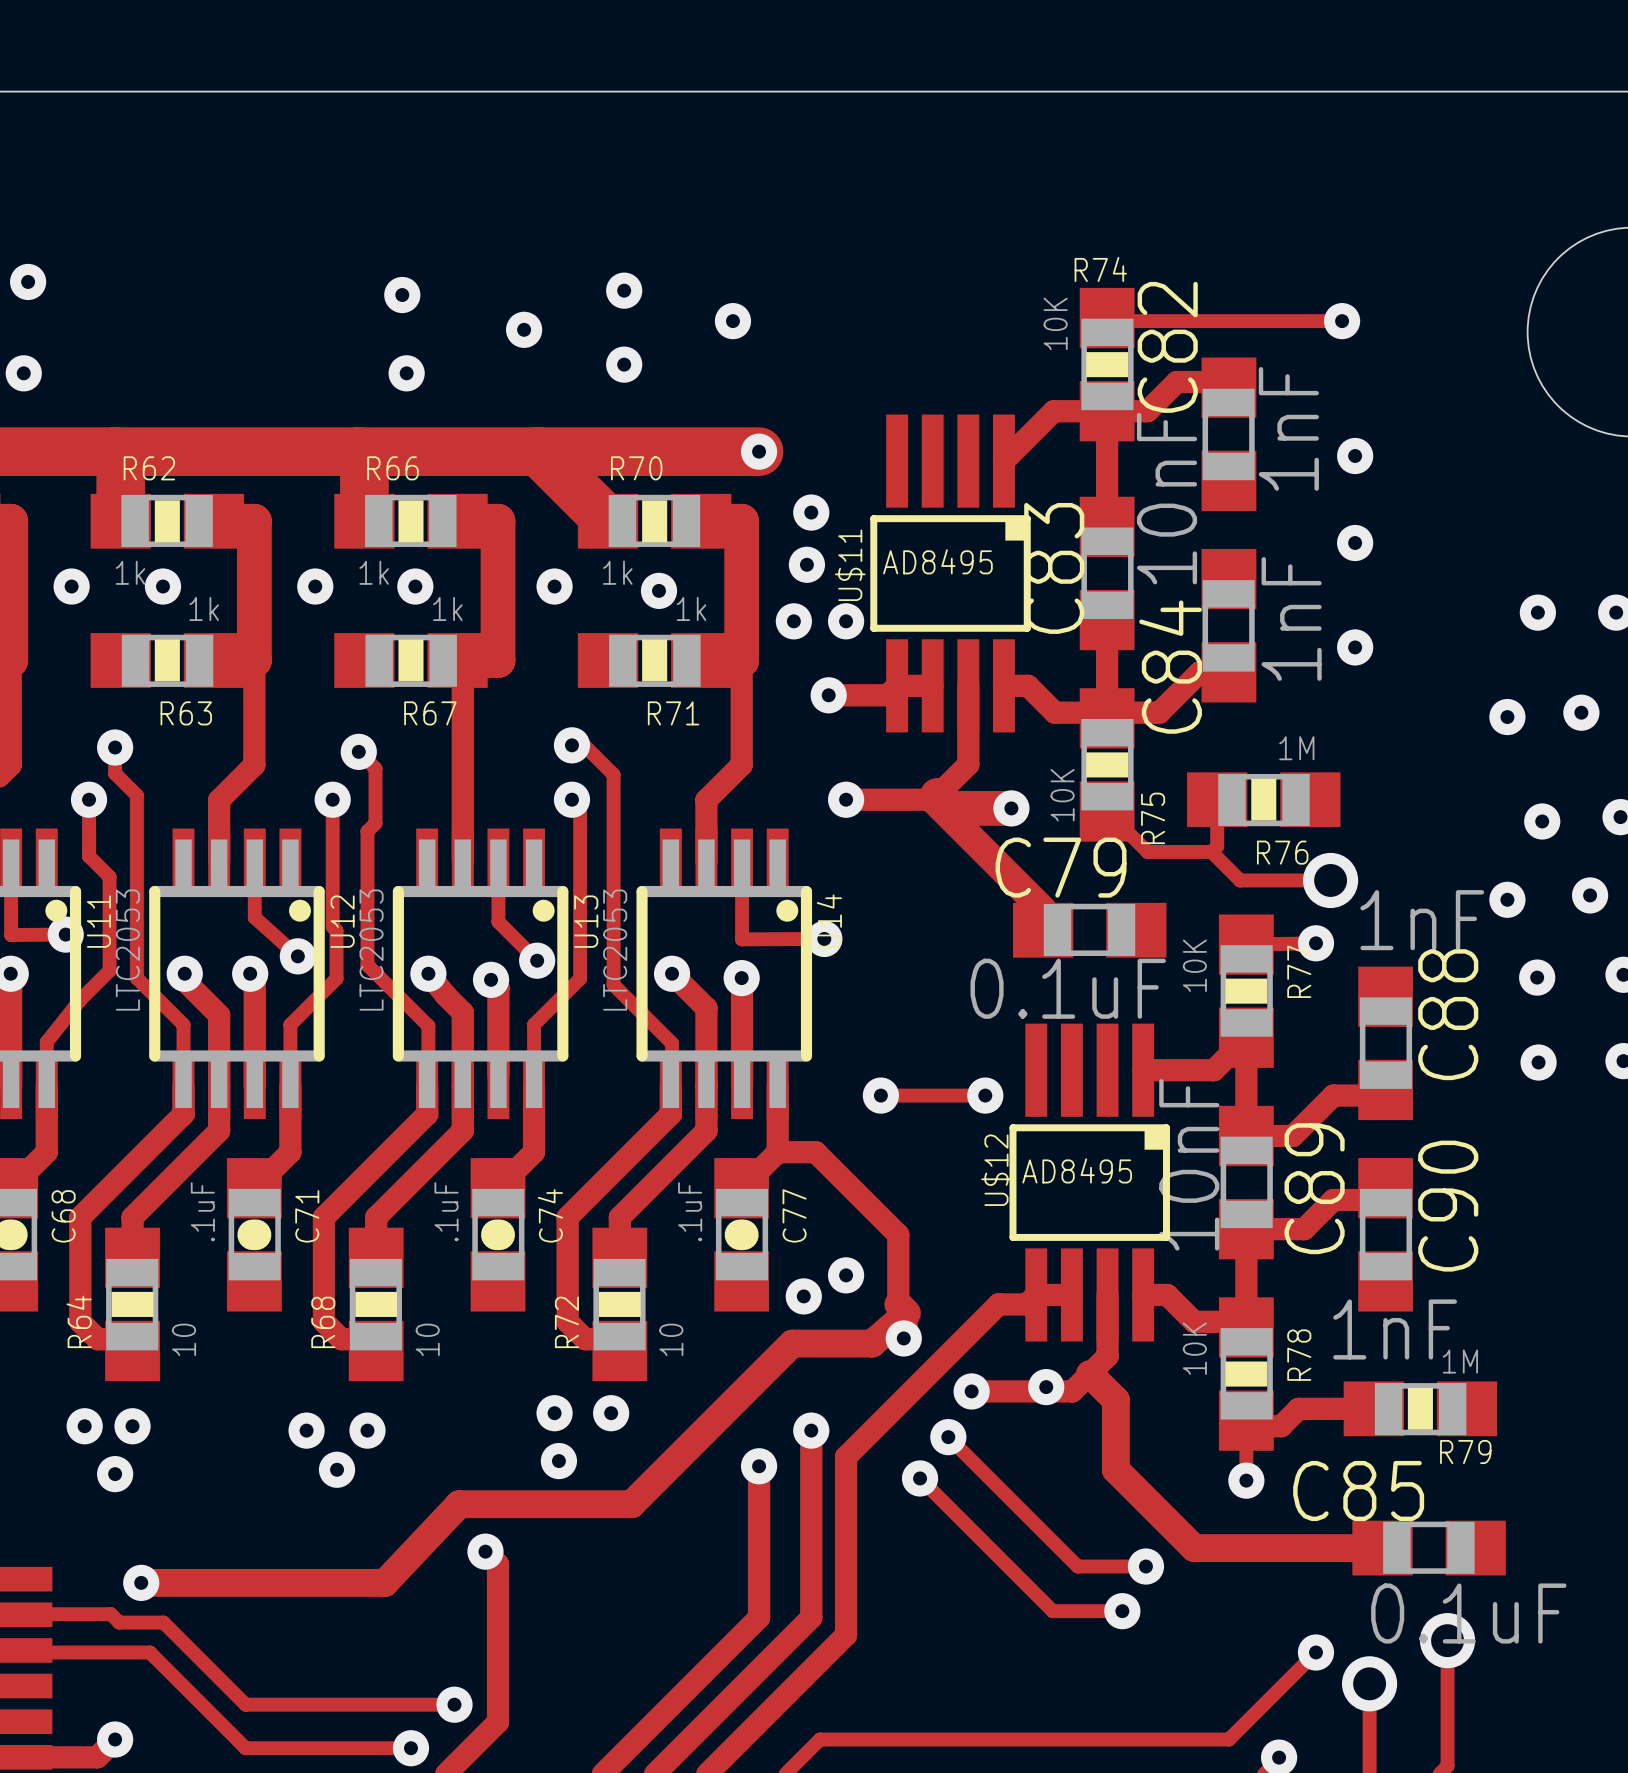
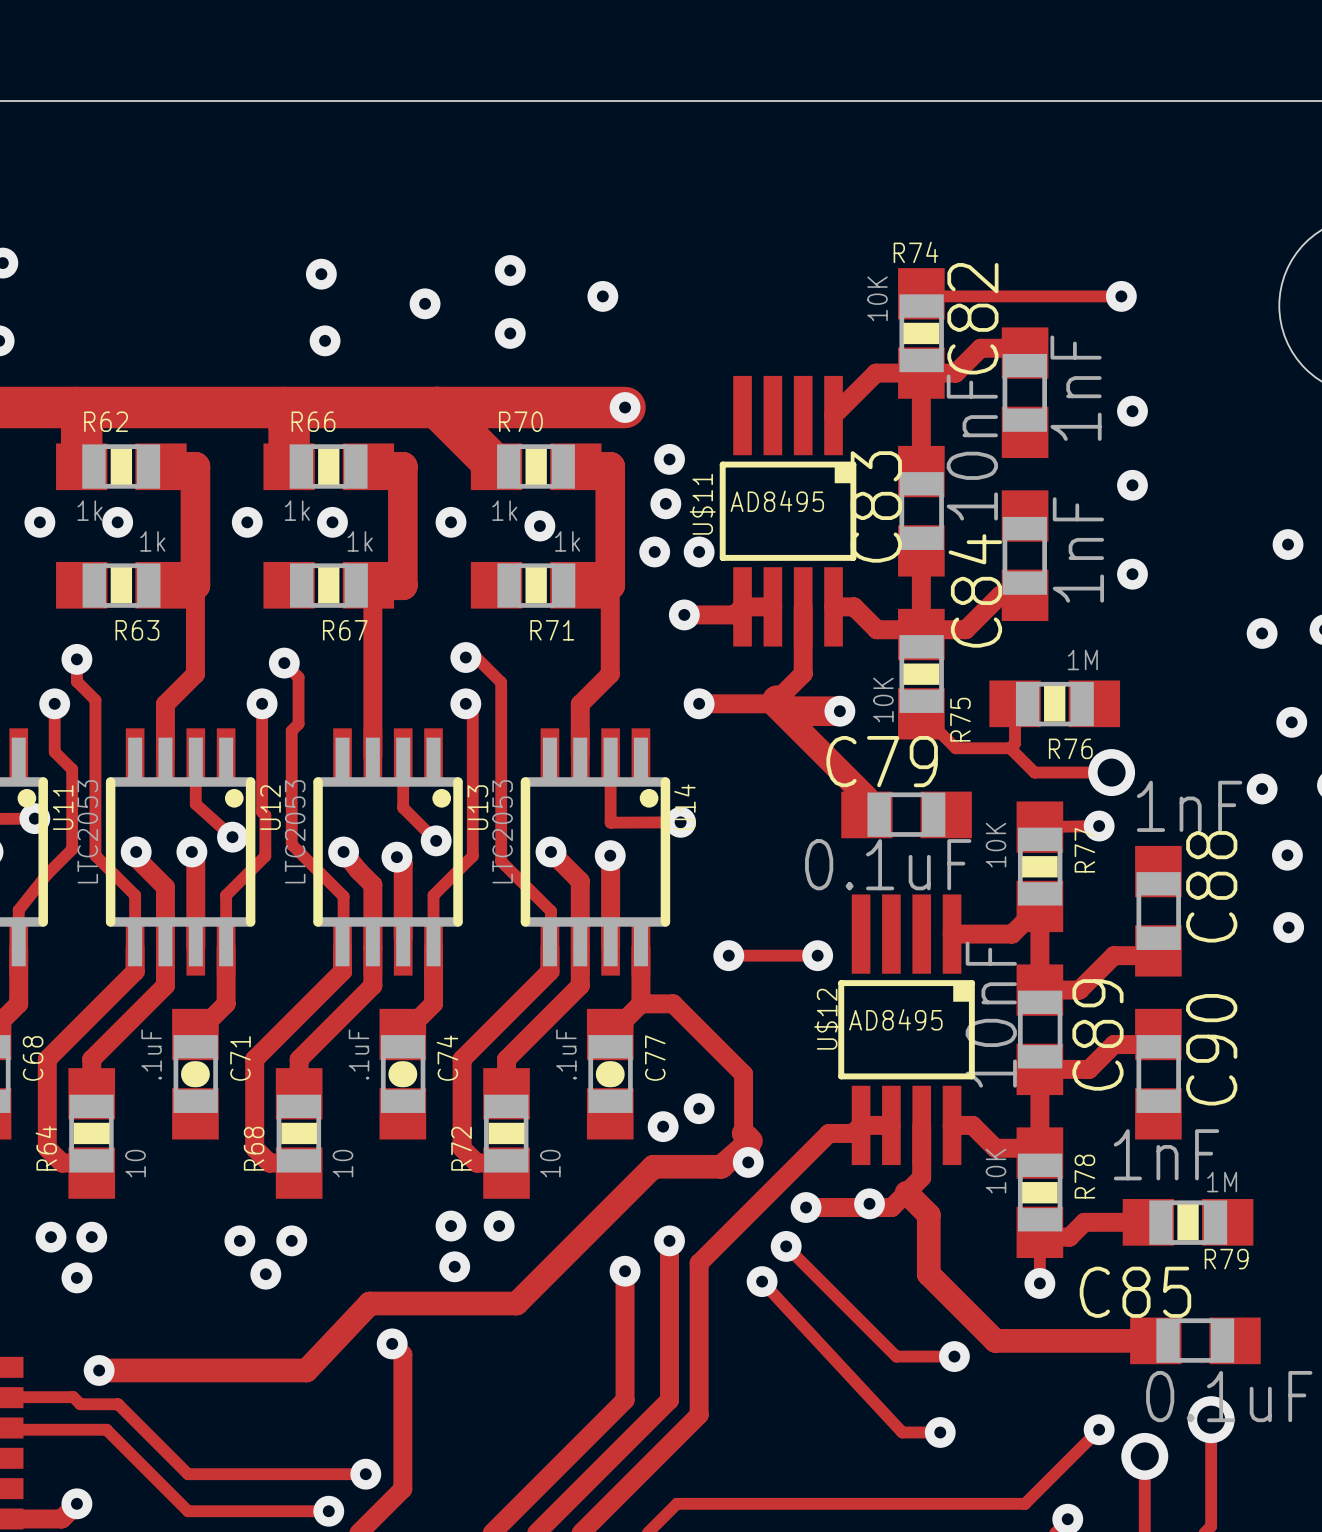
track: (920, 1478) (1052, 1611) (1122, 1611) -> (762, 1281) (902, 1432) (940, 1432)
via position: (1122, 1611) -> (940, 1432)

